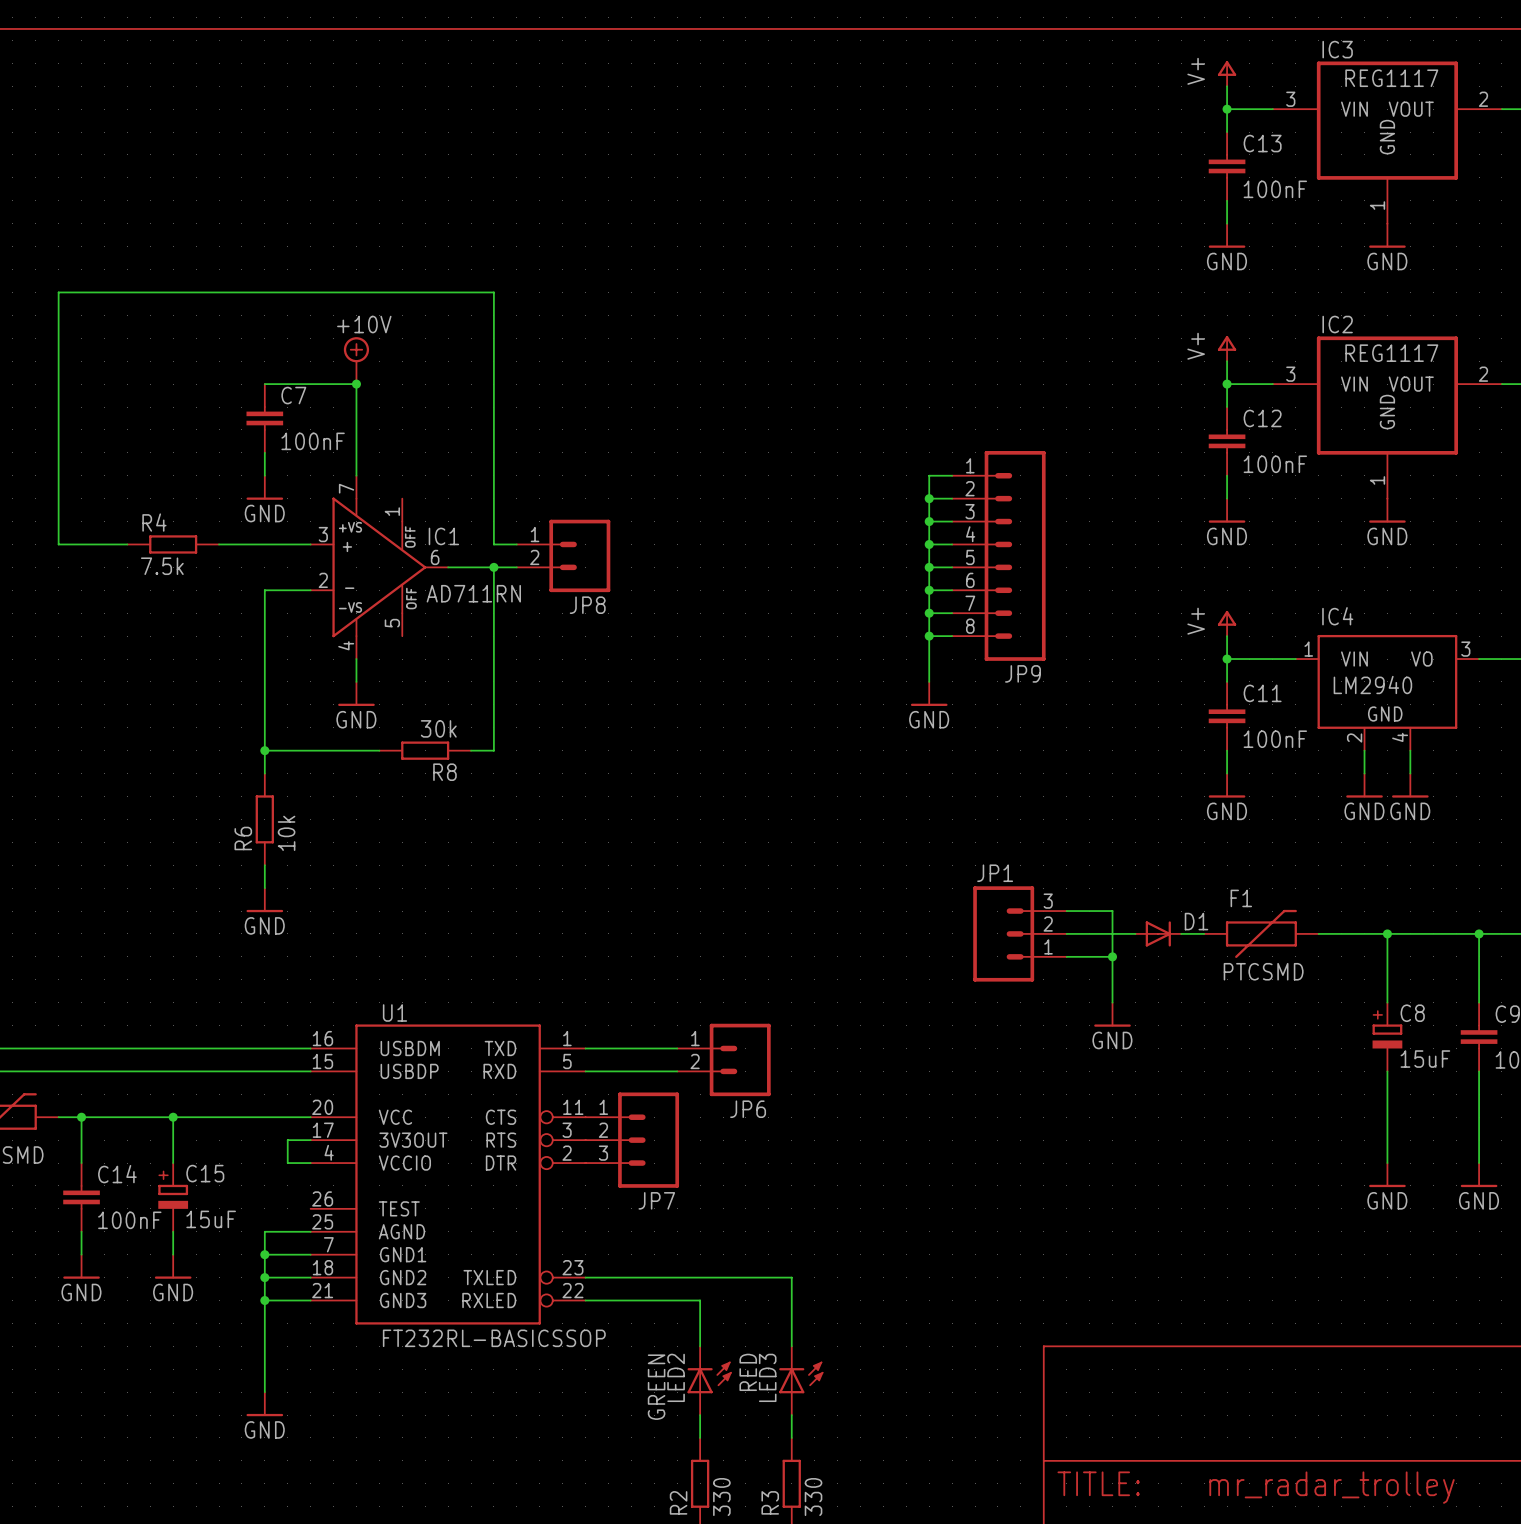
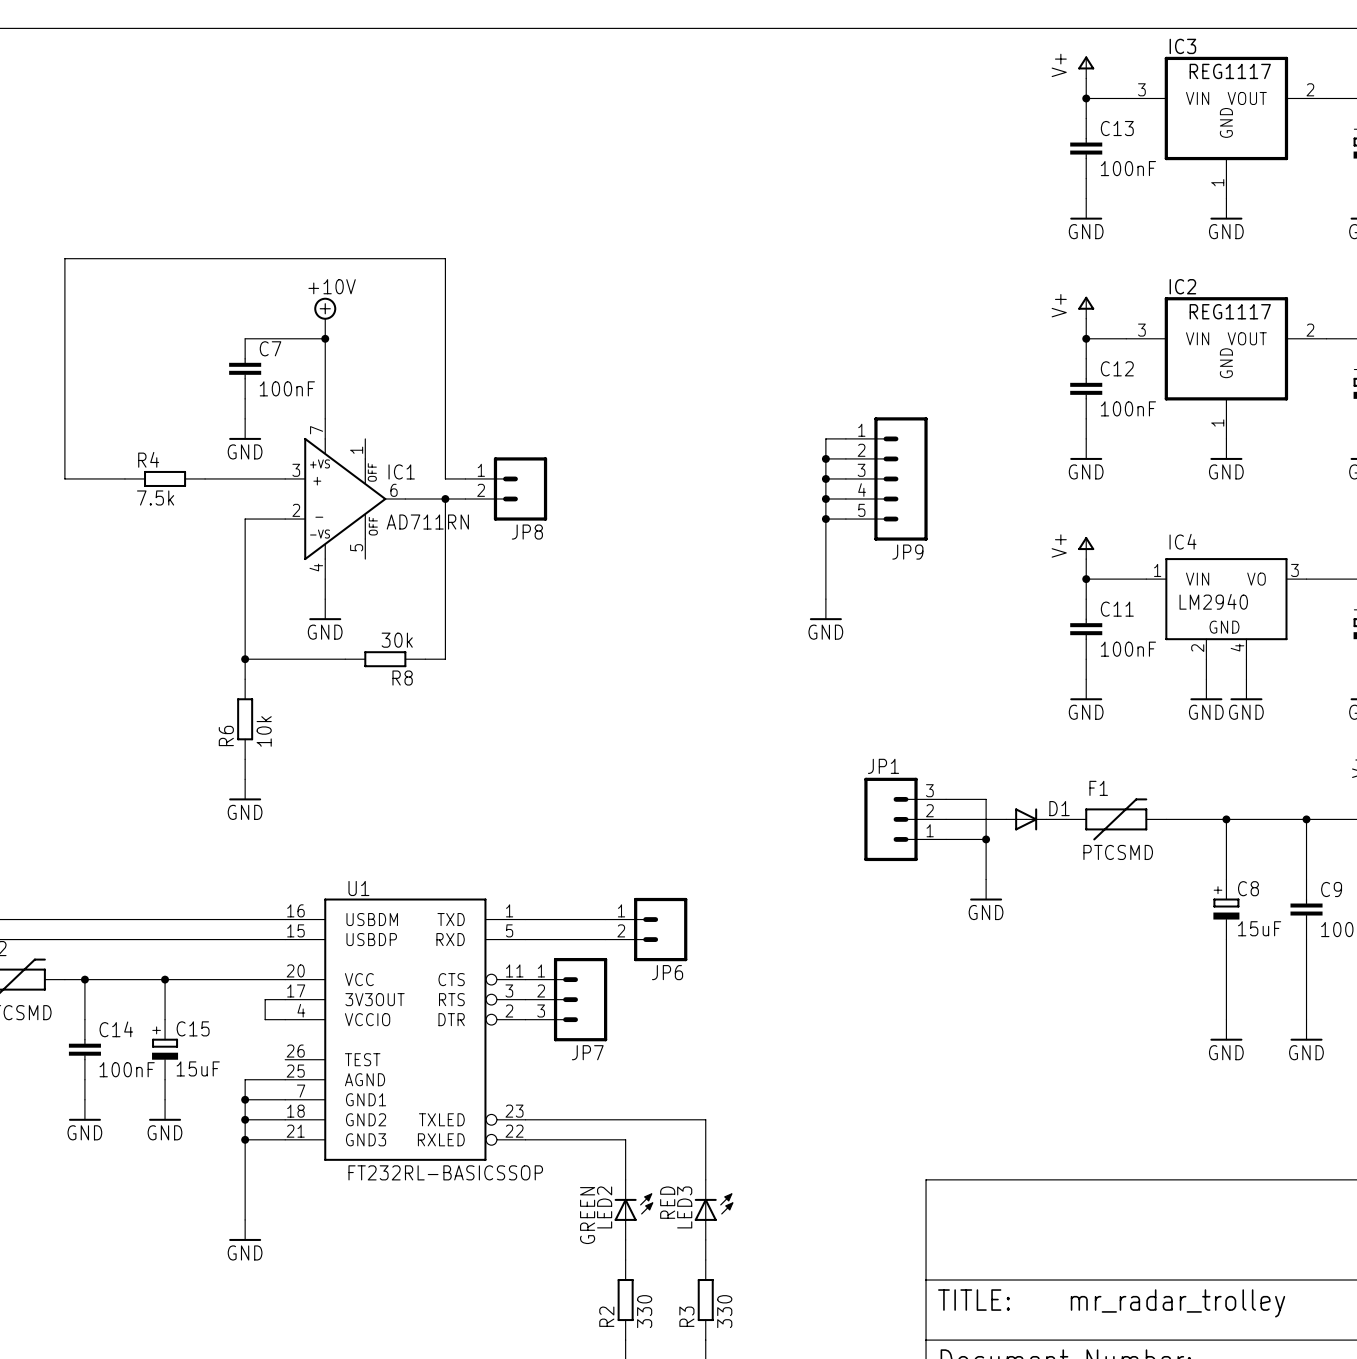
JP9 symbol: [952, 450, 1046, 661] -> [845, 417, 928, 541]
wire: (952, 475) (929, 475) (929, 498) -> none
junction: (929, 498) -> none
wire: (929, 613) (952, 613) -> none
junction: (929, 613) -> none
wire: (929, 636) (952, 636) -> none
junction: (929, 636) -> none
JP9 name position: JP9 (1023, 673) -> JP9 (907, 552)

